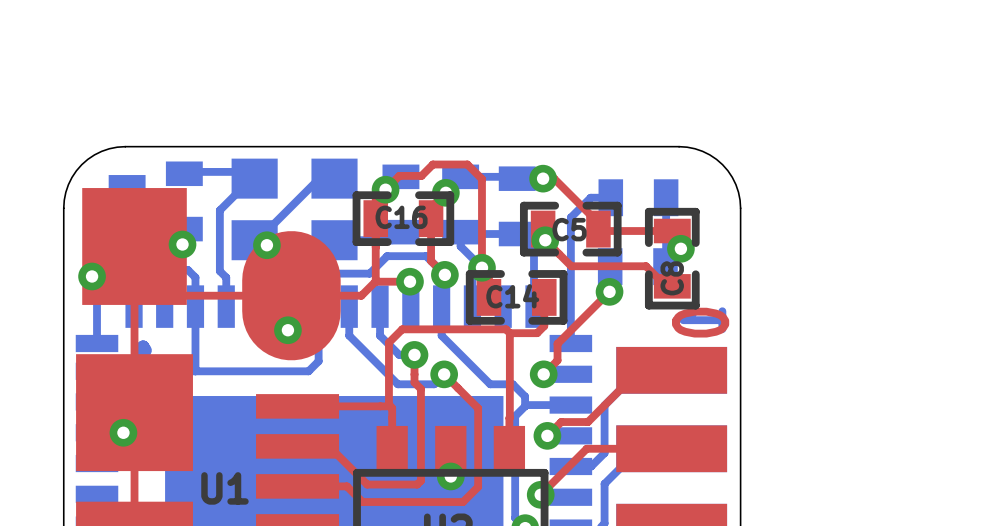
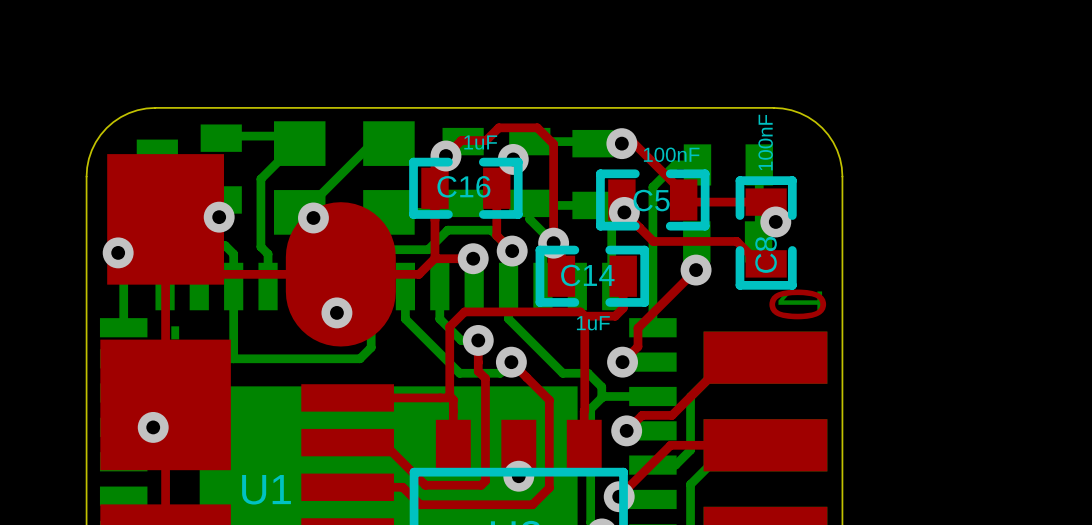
C16 value: none -> 1uF (480, 142)
C8 value: none -> 100nF (765, 142)
C5 value: none -> 100nF (671, 154)
C14 value: none -> 1uF (593, 323)

